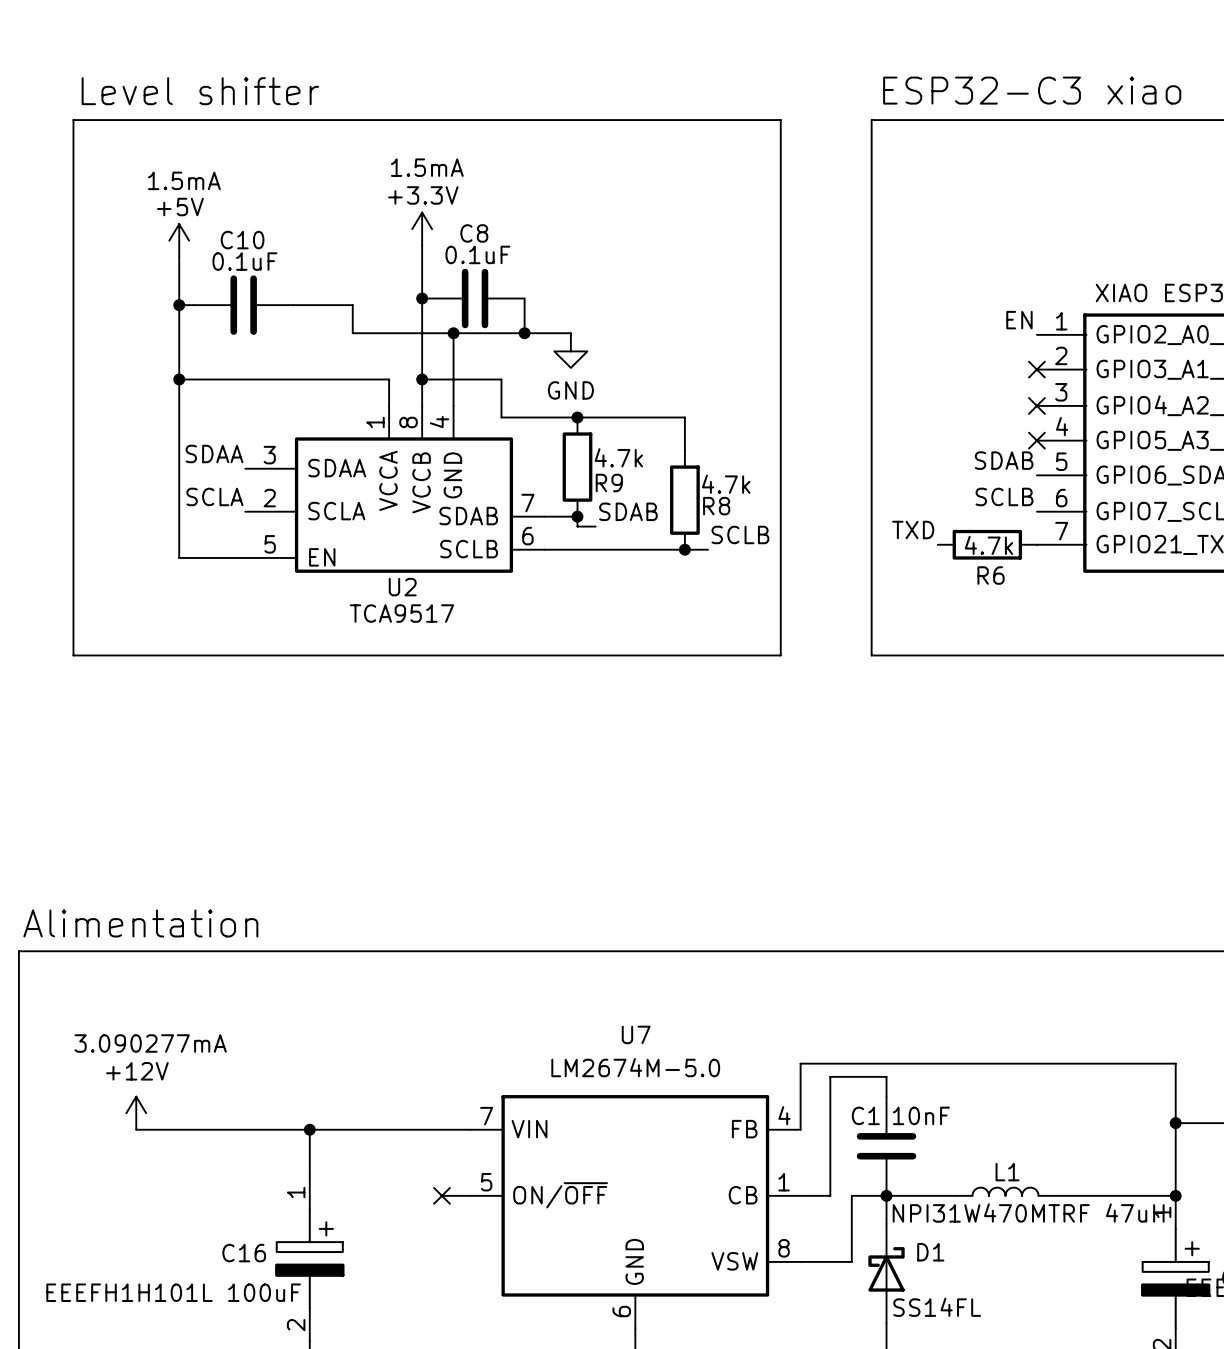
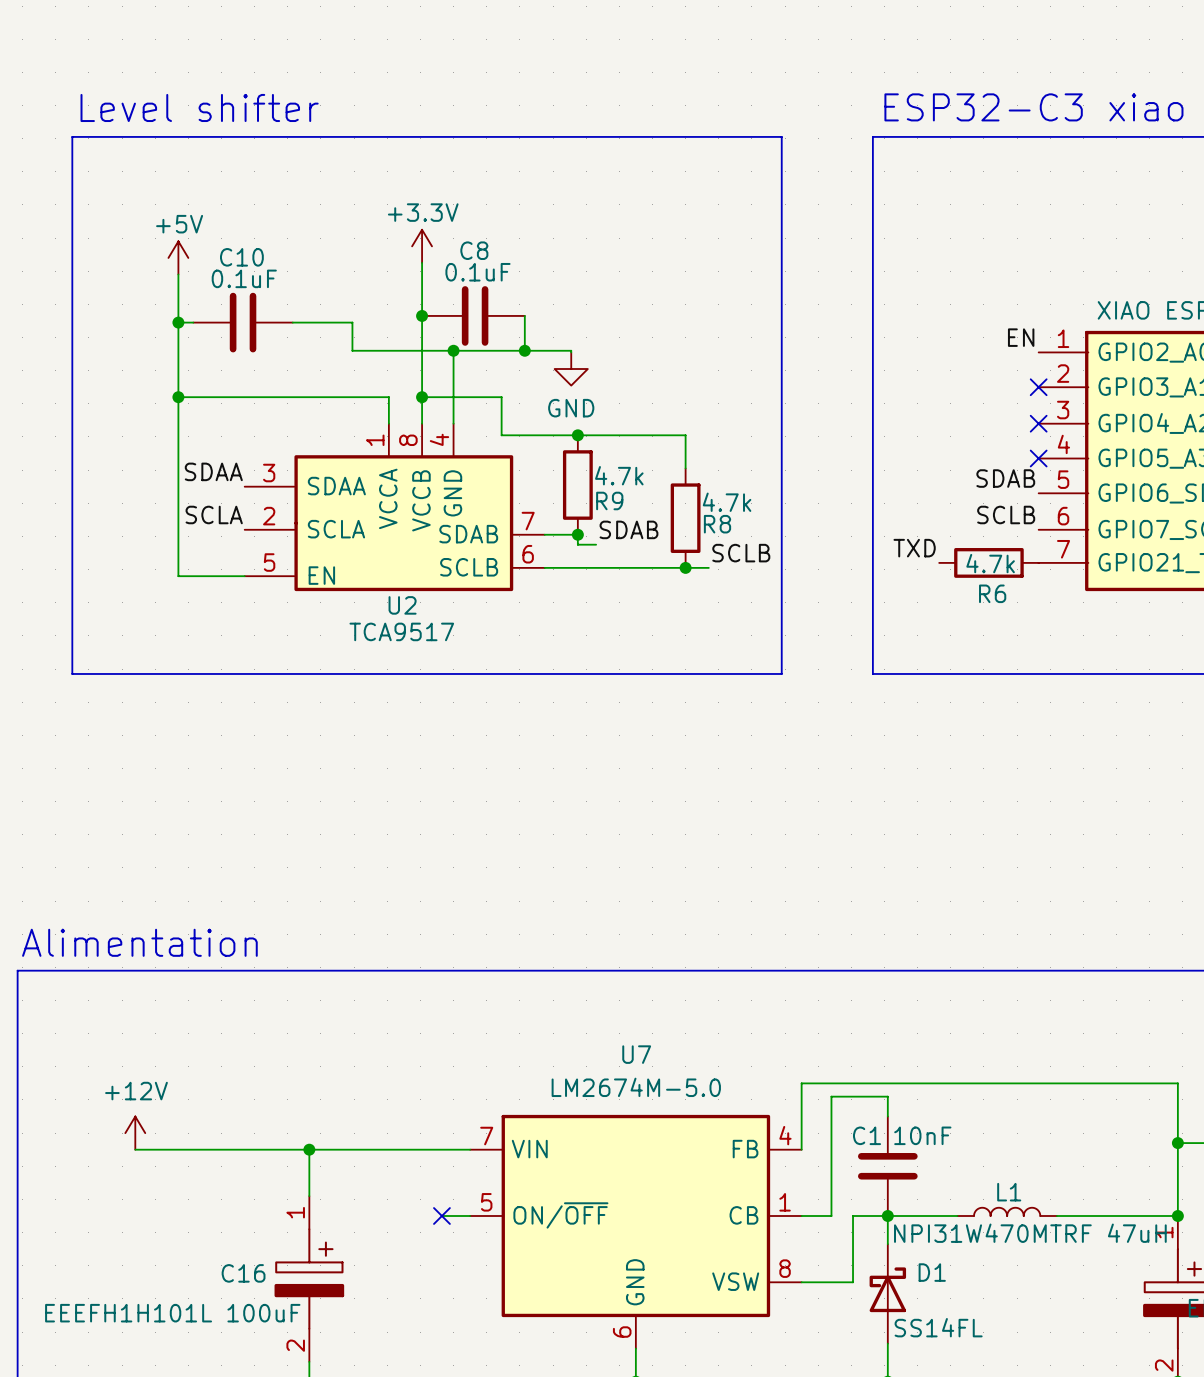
text: 1.5mA (427, 167) -> none
text: 1.5mA (184, 180) -> none
text: 3.090277mA (150, 1043) -> none

